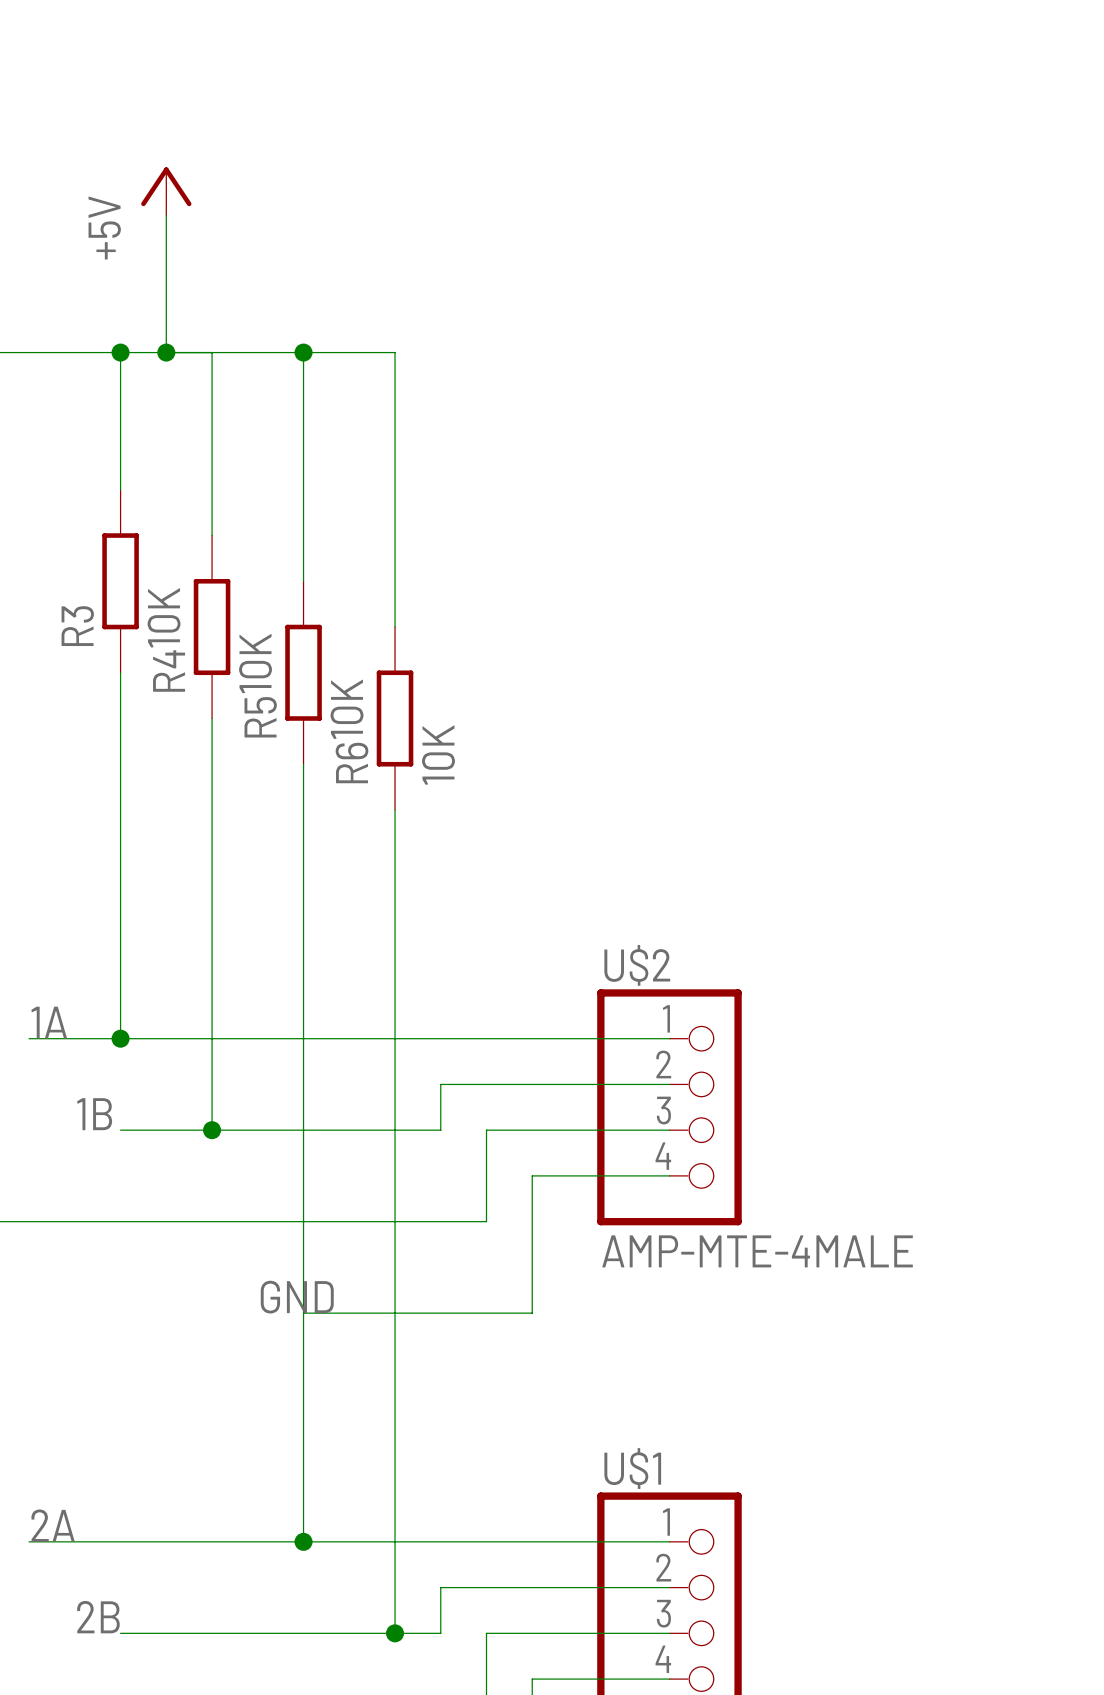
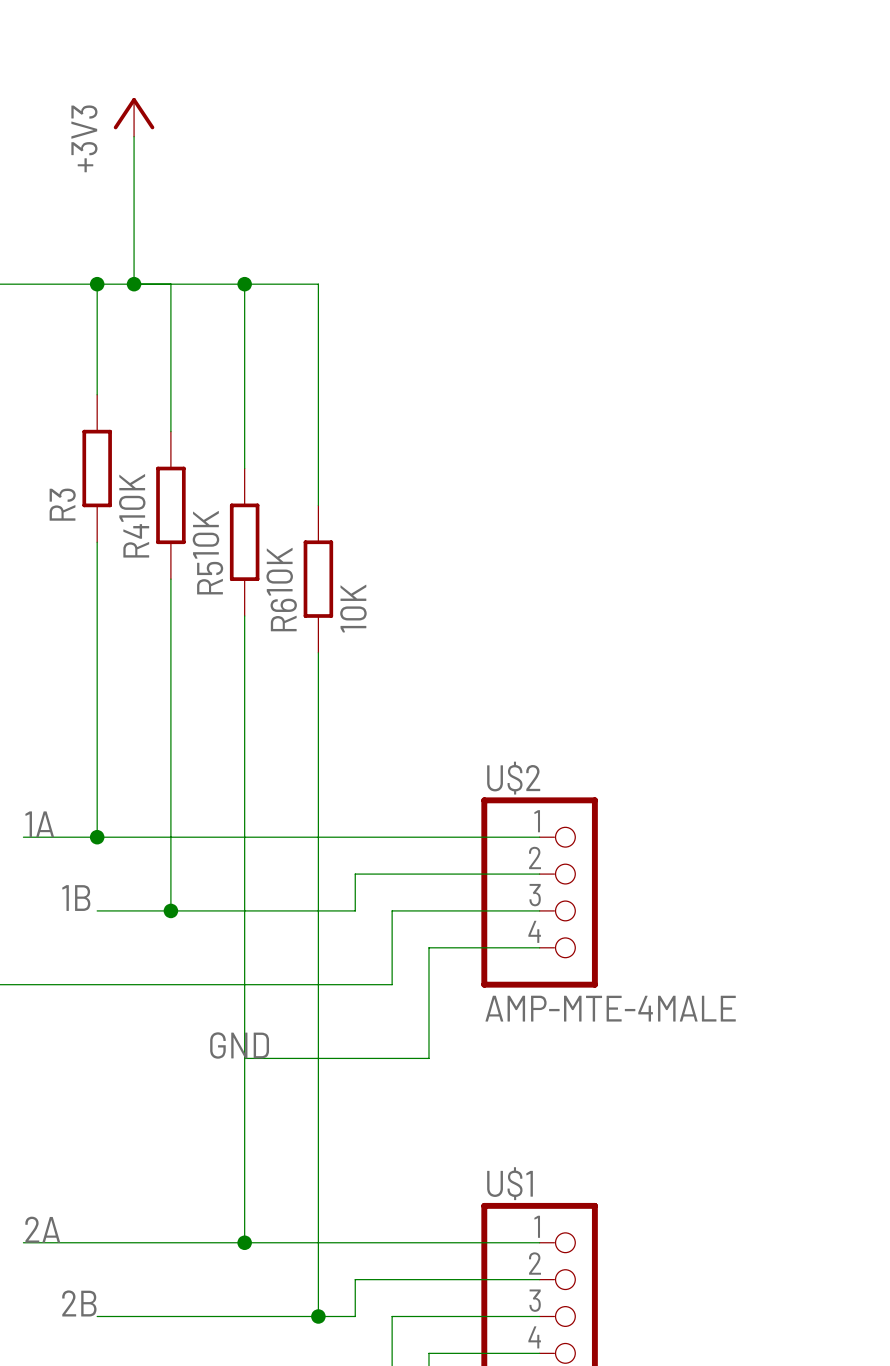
power symbol: none -> +3V3 (134, 117)
power symbol: +5V (166, 191) -> none

